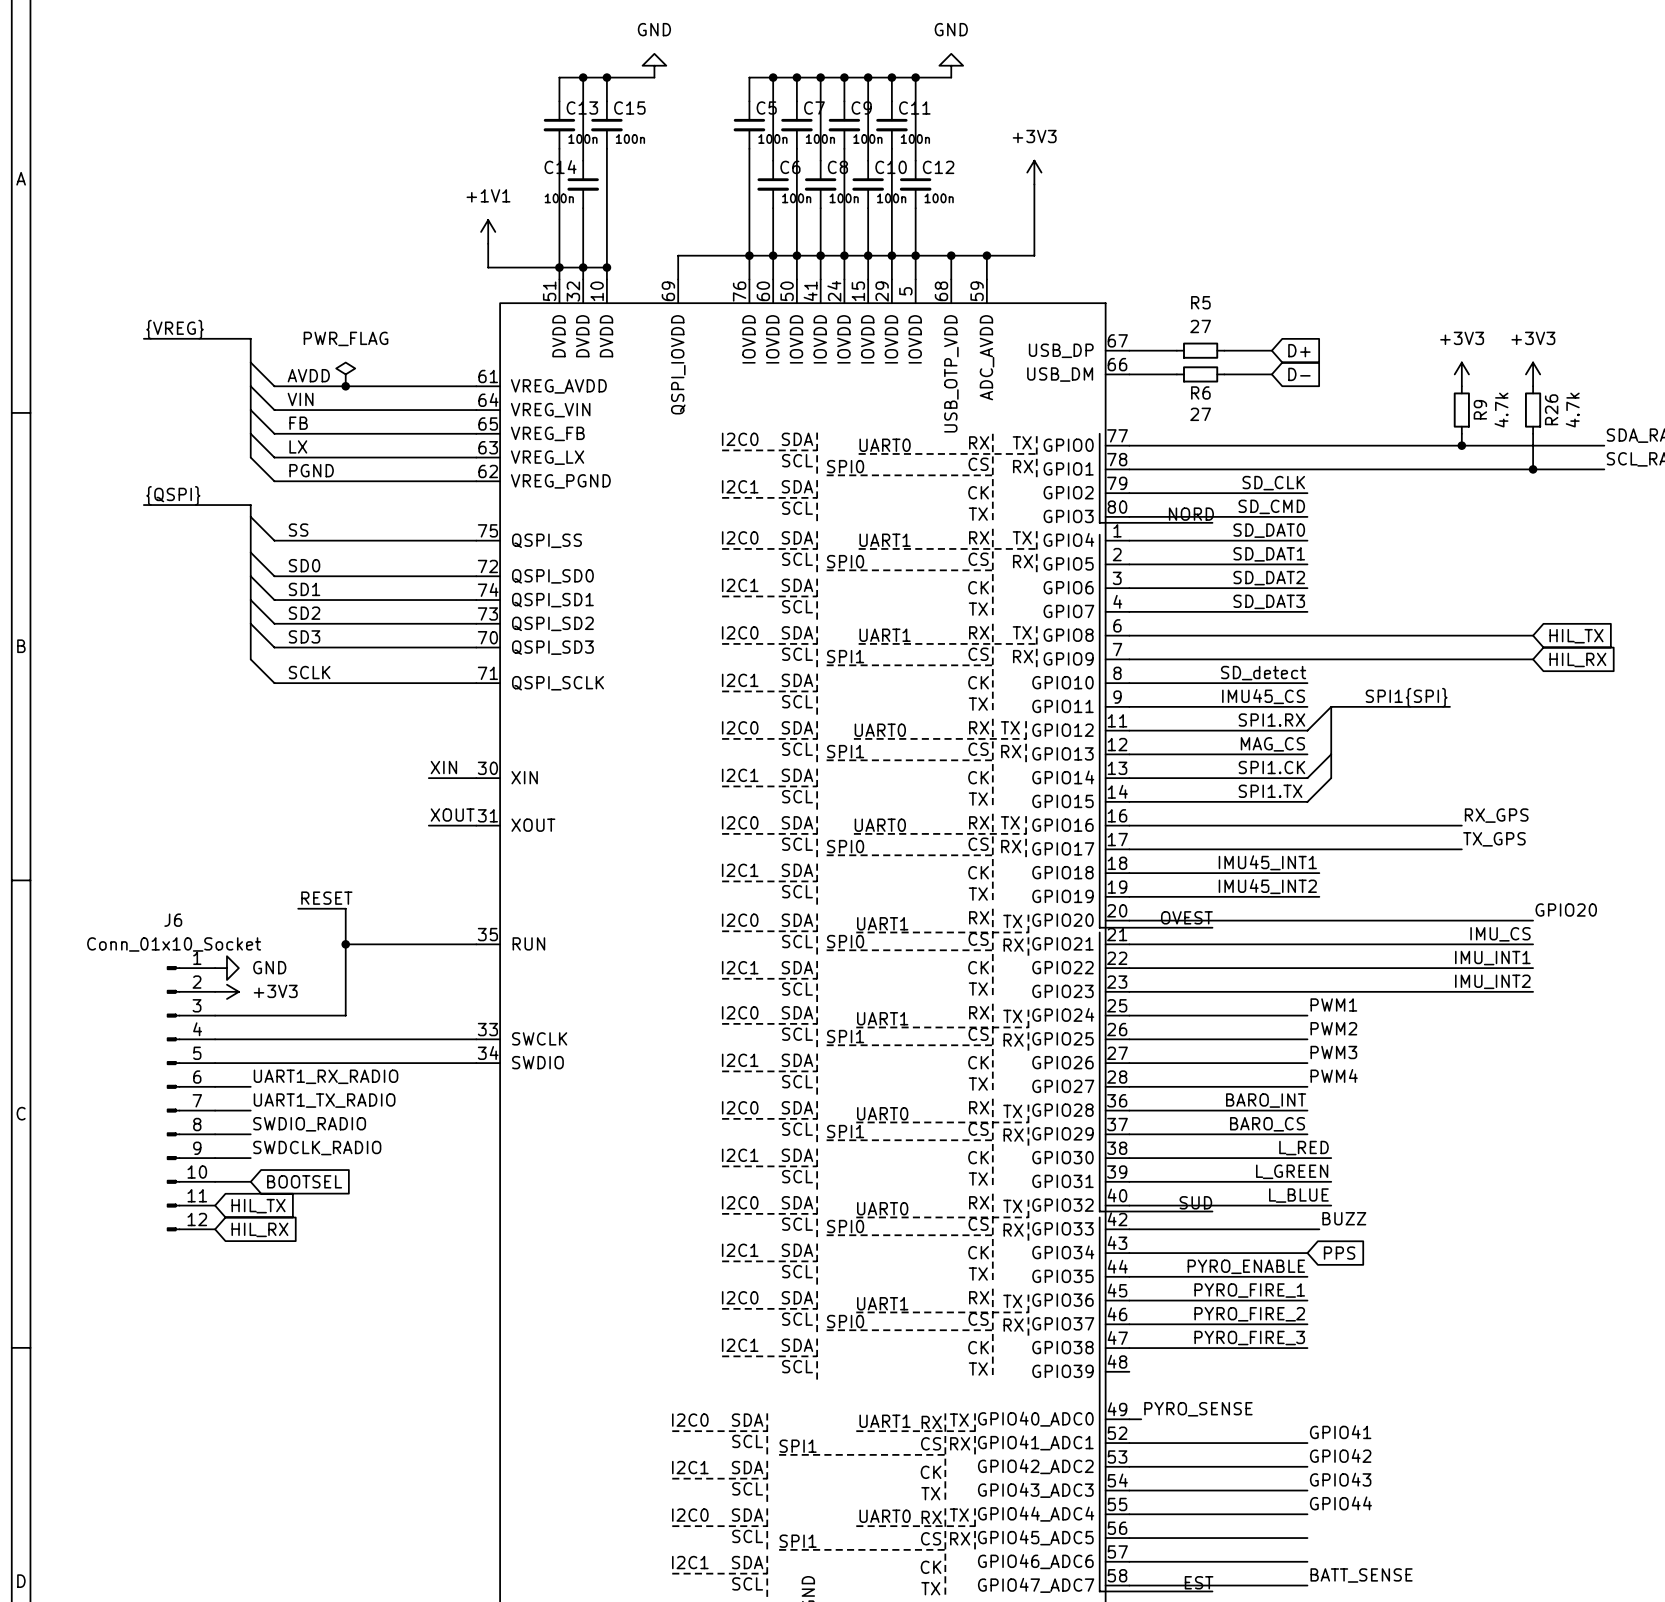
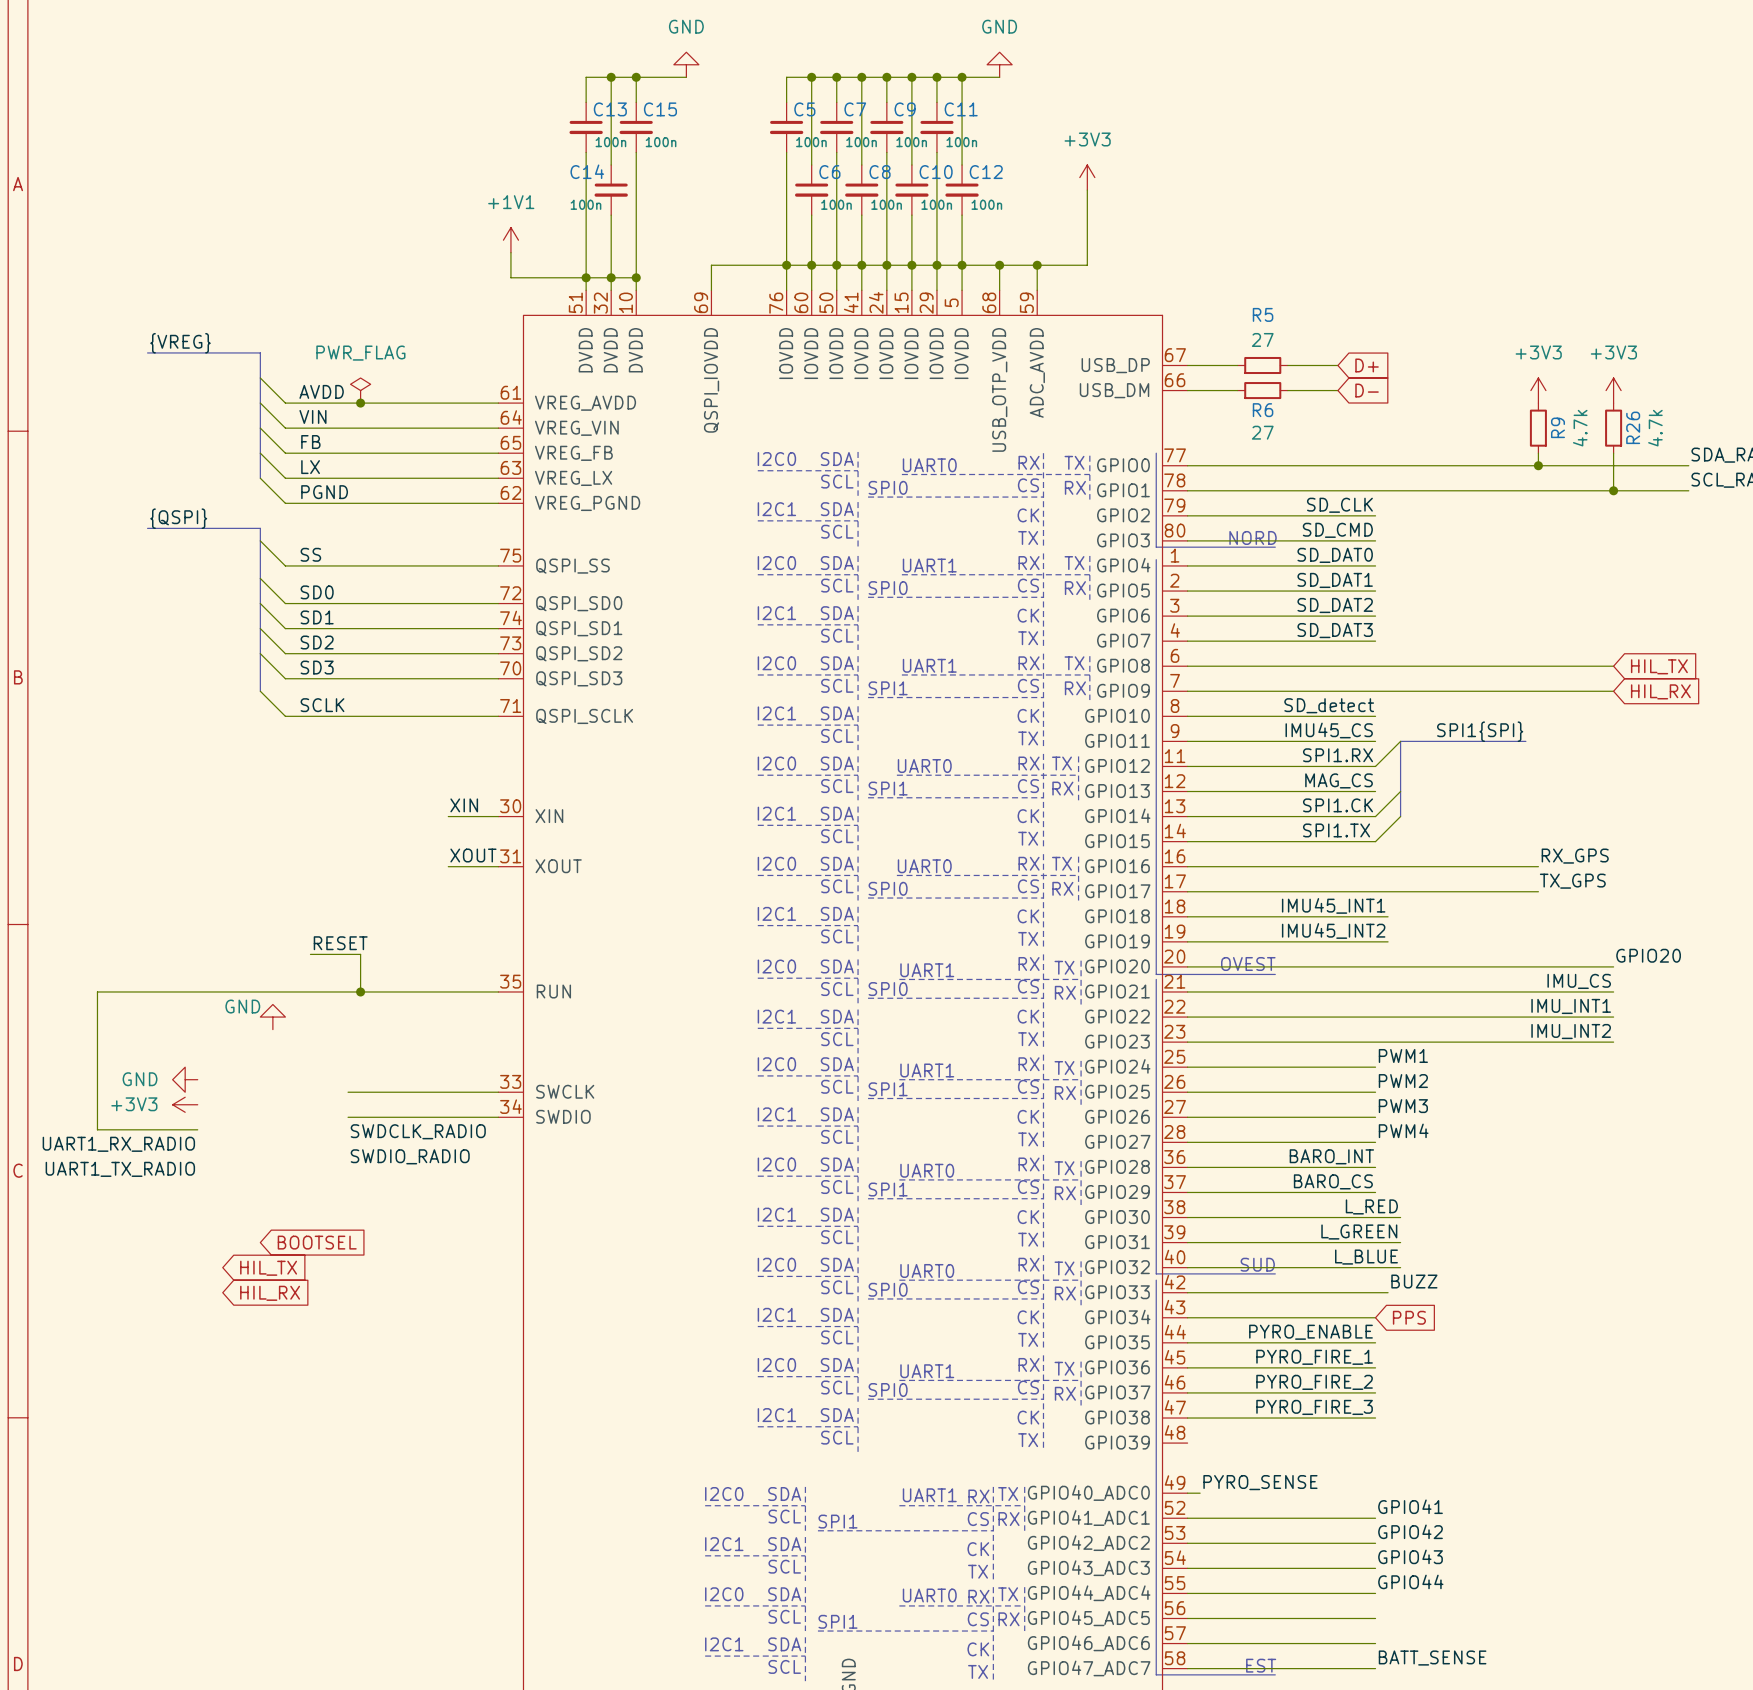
wire: (345, 944) (345, 1015) (215, 1015) -> (360, 991) (97, 991) (97, 1129) (197, 1129)
power symbol text position: GND (269, 967) -> GND (242, 1006)
power symbol rotation: 0° (226, 968) -> 90° counterclockwise (272, 1017)
power symbol position: GND (226, 968) -> GND (272, 1017)
power symbol rotation: 0° (226, 991) -> 180° (185, 1104)
power symbol position: +3V3 (226, 991) -> +3V3 (185, 1104)
power symbol: none -> GND (185, 1079)
wire: (215, 1039) (333, 1039) -> none
wire: (215, 1063) (333, 1063) -> none
label position: UART1_RX_RADIO (326, 1076) -> UART1_RX_RADIO (118, 1144)
wire: (215, 1086) (250, 1086) -> none
J6: Conn_01x10_Socket (191, 1098) -> none
label position: UART1_TX_RADIO (324, 1100) -> UART1_TX_RADIO (120, 1169)
wire: (215, 1110) (250, 1110) -> none
label position: SWDIO_RADIO (309, 1124) -> SWDIO_RADIO (410, 1156)
wire: (215, 1134) (250, 1134) -> none
label position: SWDCLK_RADIO (317, 1148) -> SWDCLK_RADIO (418, 1131)
wire: (215, 1158) (250, 1158) -> none
wire: (215, 1181) (250, 1181) -> none

